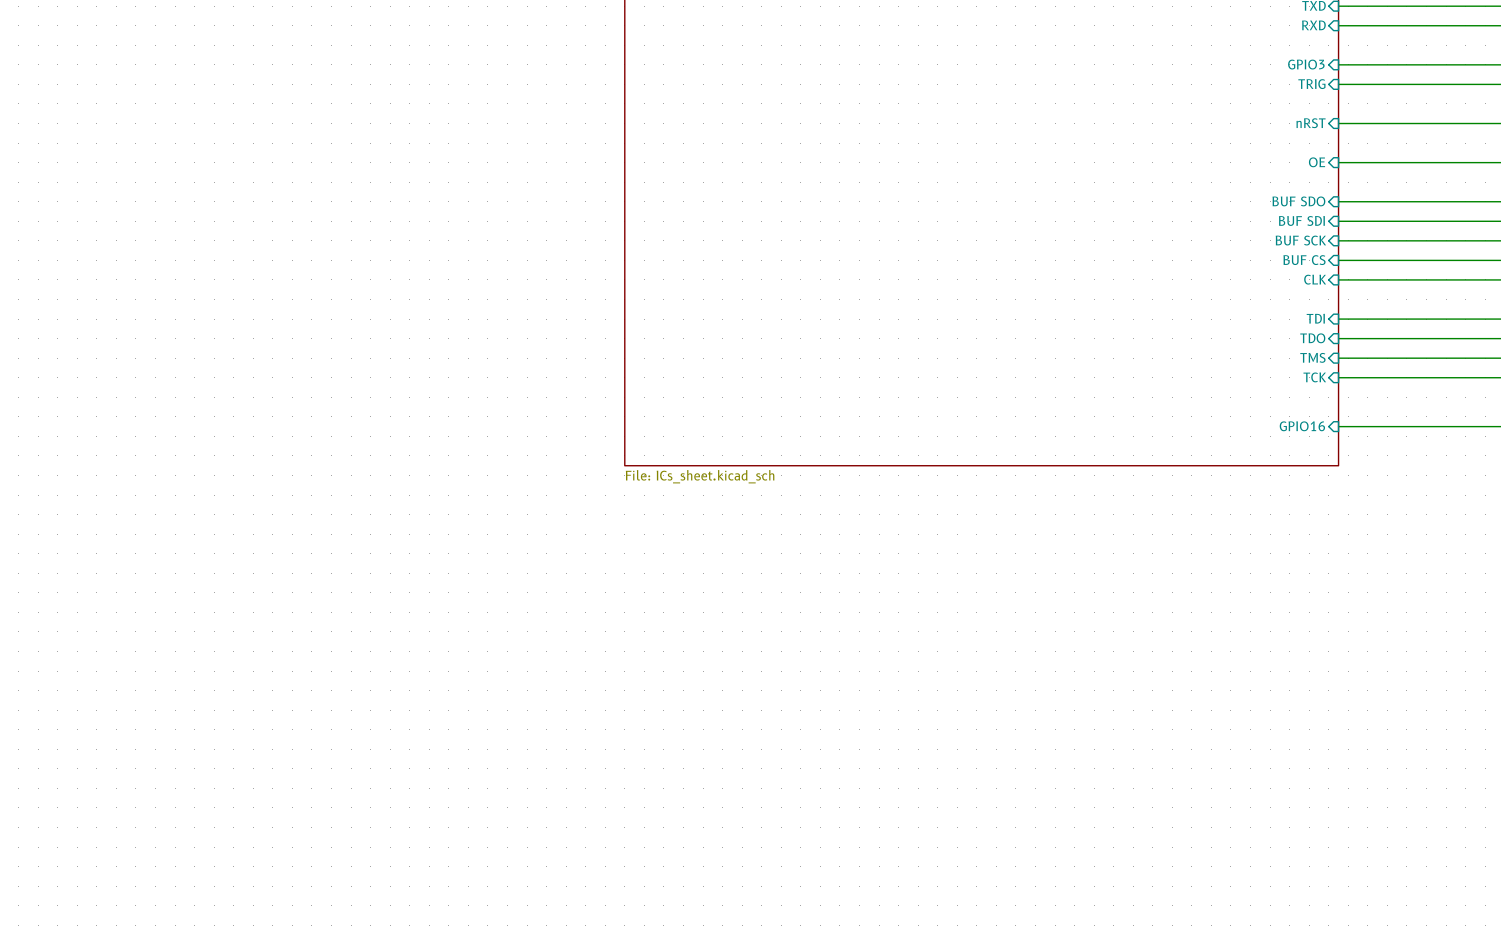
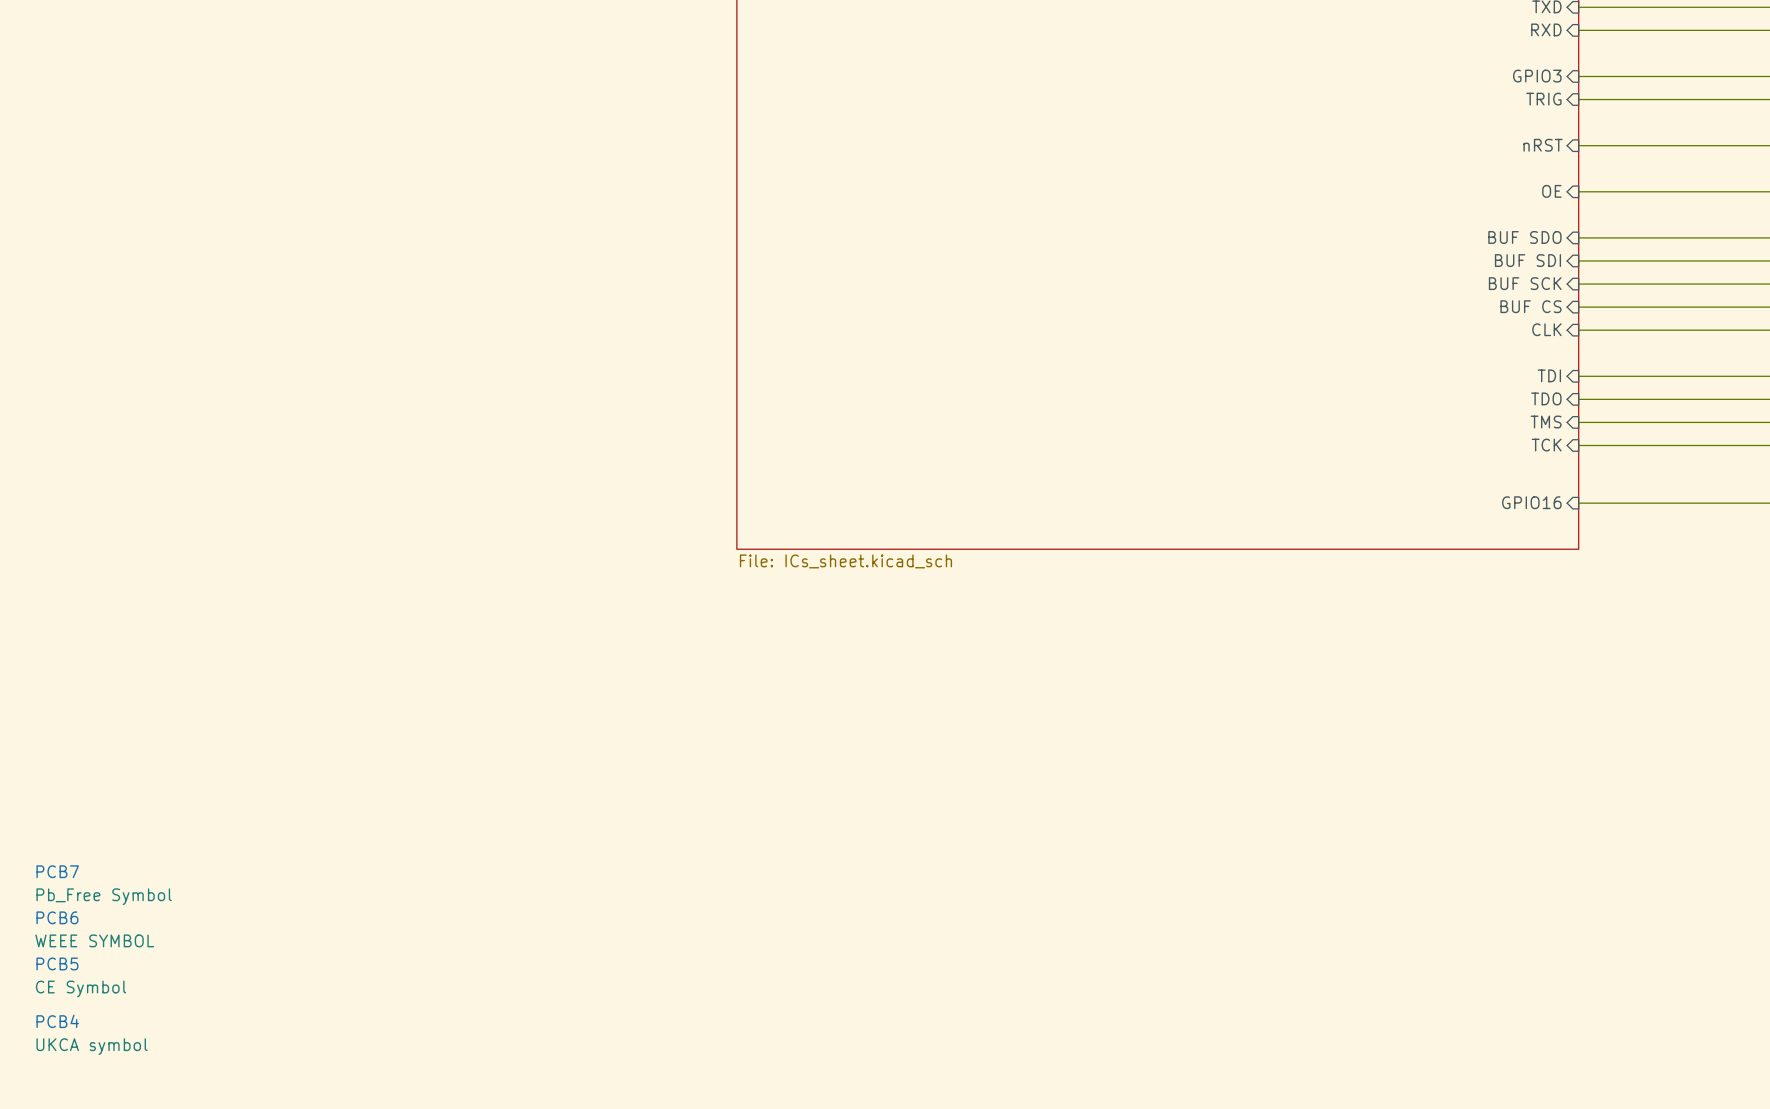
PCB7: none -> Pb_Free Symbol (104, 885)
PCB6: none -> WEEE SYMBOL (94, 929)
PCB5: none -> CE Symbol (81, 977)
PCB4: none -> UKCA symbol (92, 1034)

